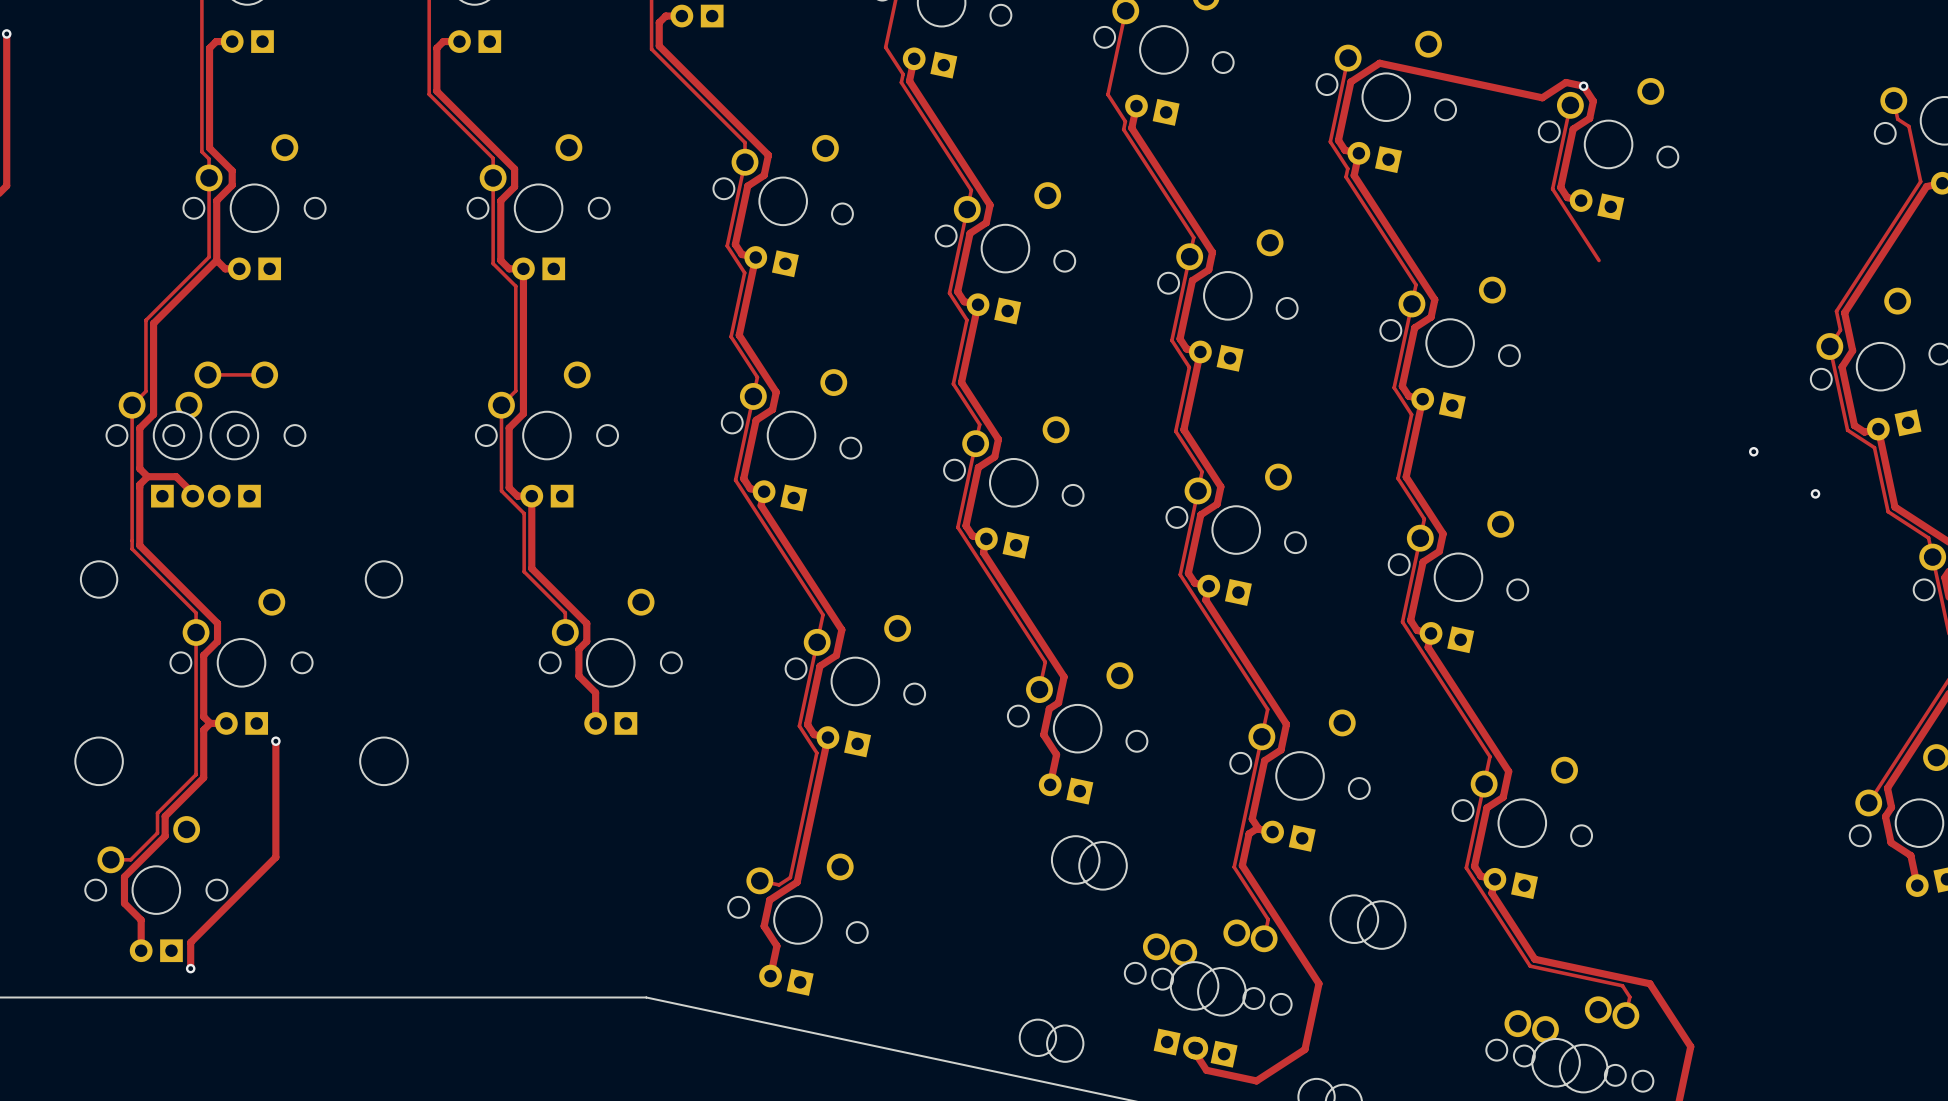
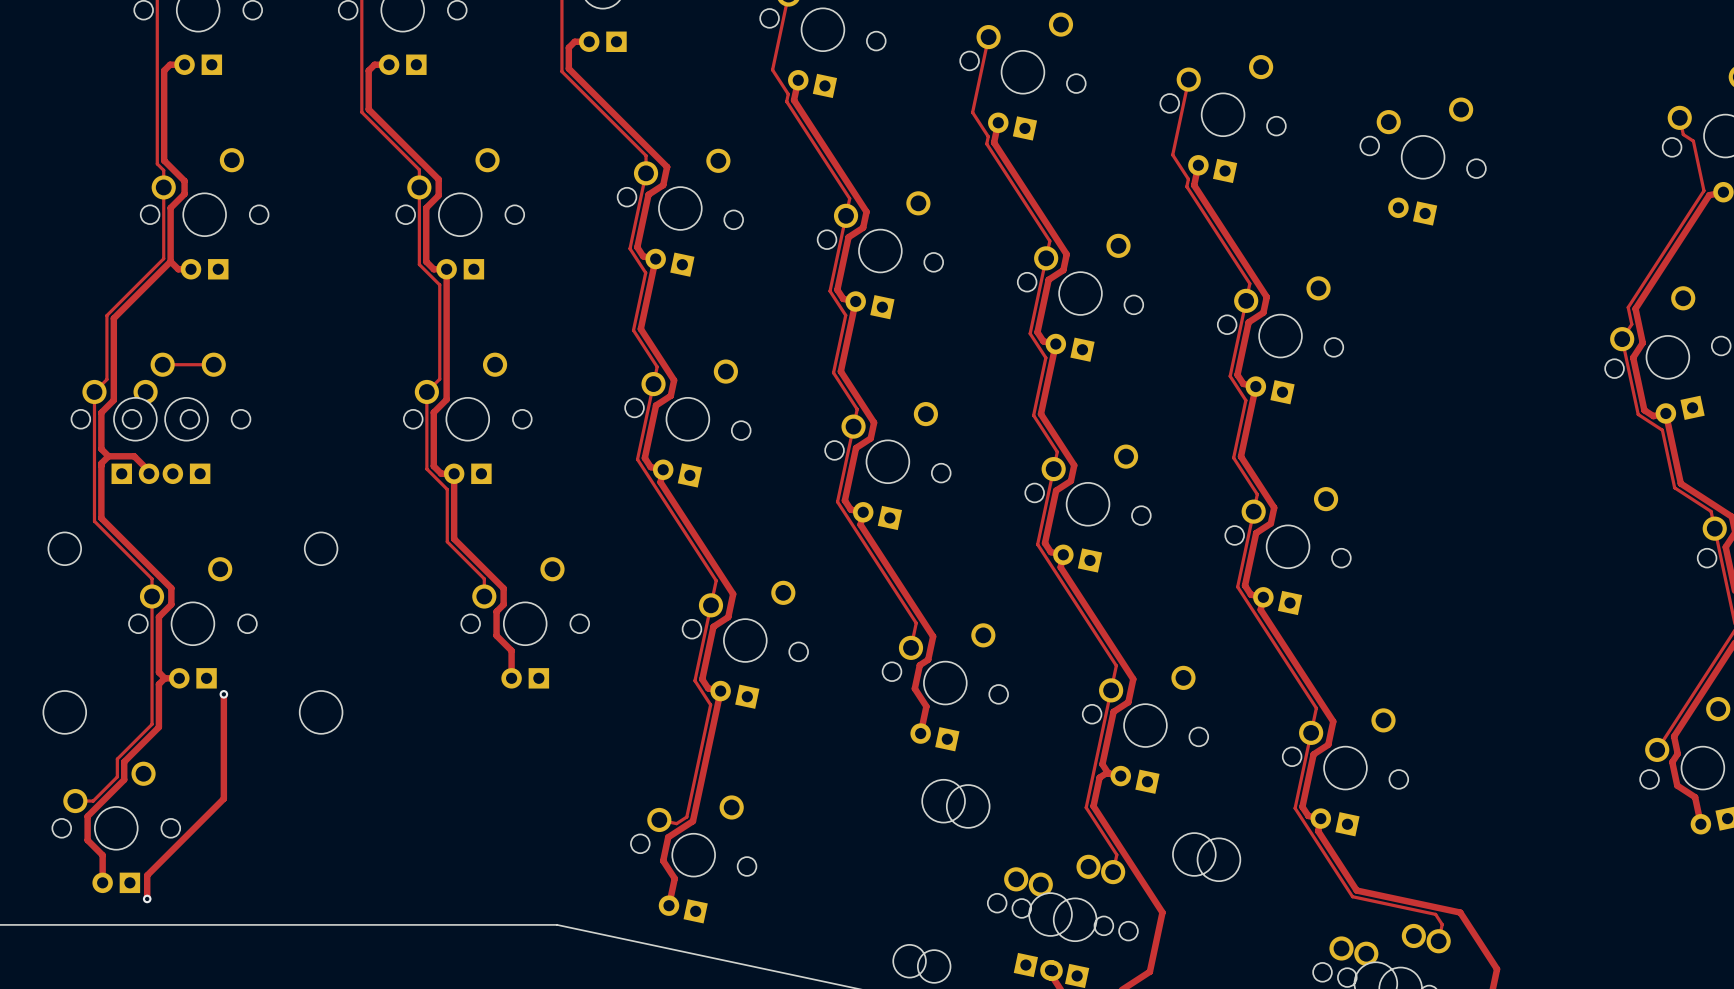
via: (1583, 86) -> none
track: (1570, 105) (1552, 189) (1599, 260) -> none
track: (1358, 153) (1344, 150) (1338, 140) (1350, 81) (1379, 63) (1542, 97) (1566, 82) (1583, 86) (1593, 101) (1589, 118) (1573, 129) (1560, 187) (1567, 197) (1581, 200) -> none
via: (1753, 451) -> none
via: (1815, 493) -> none

